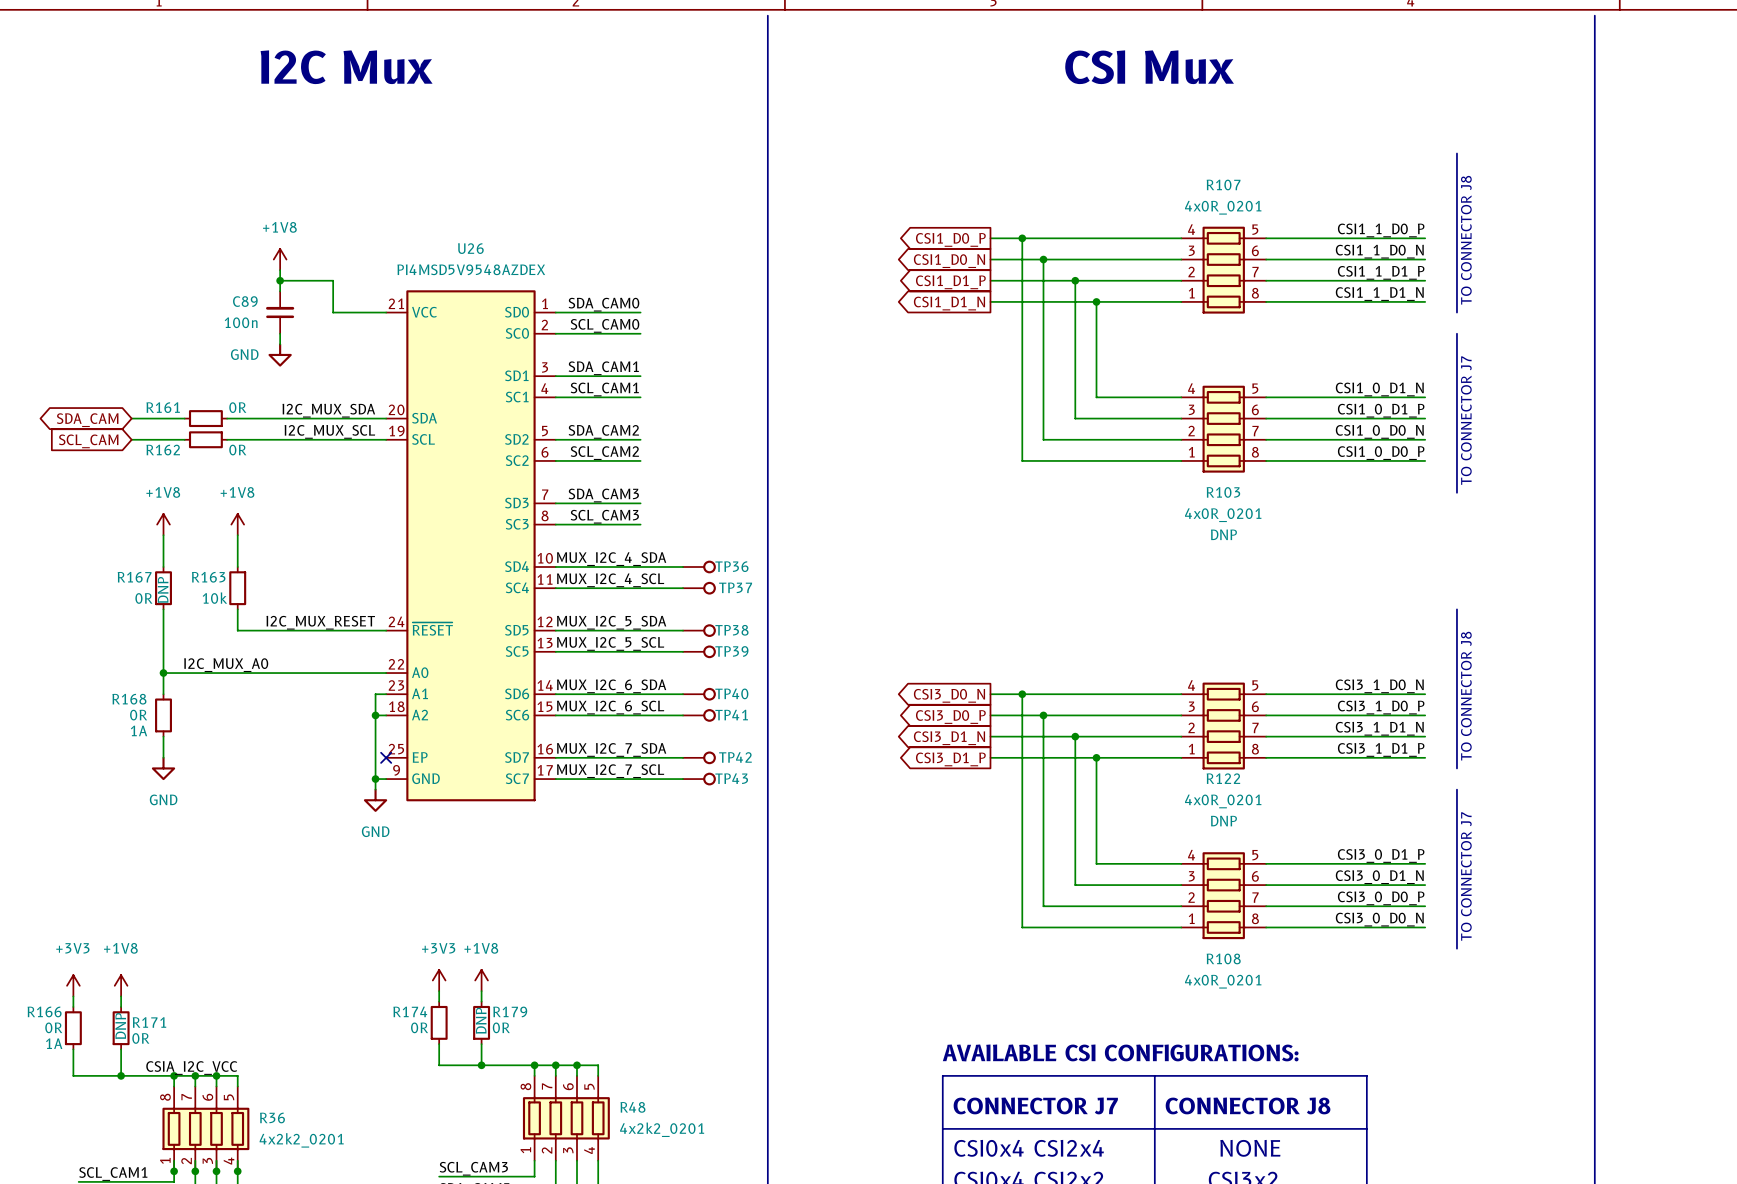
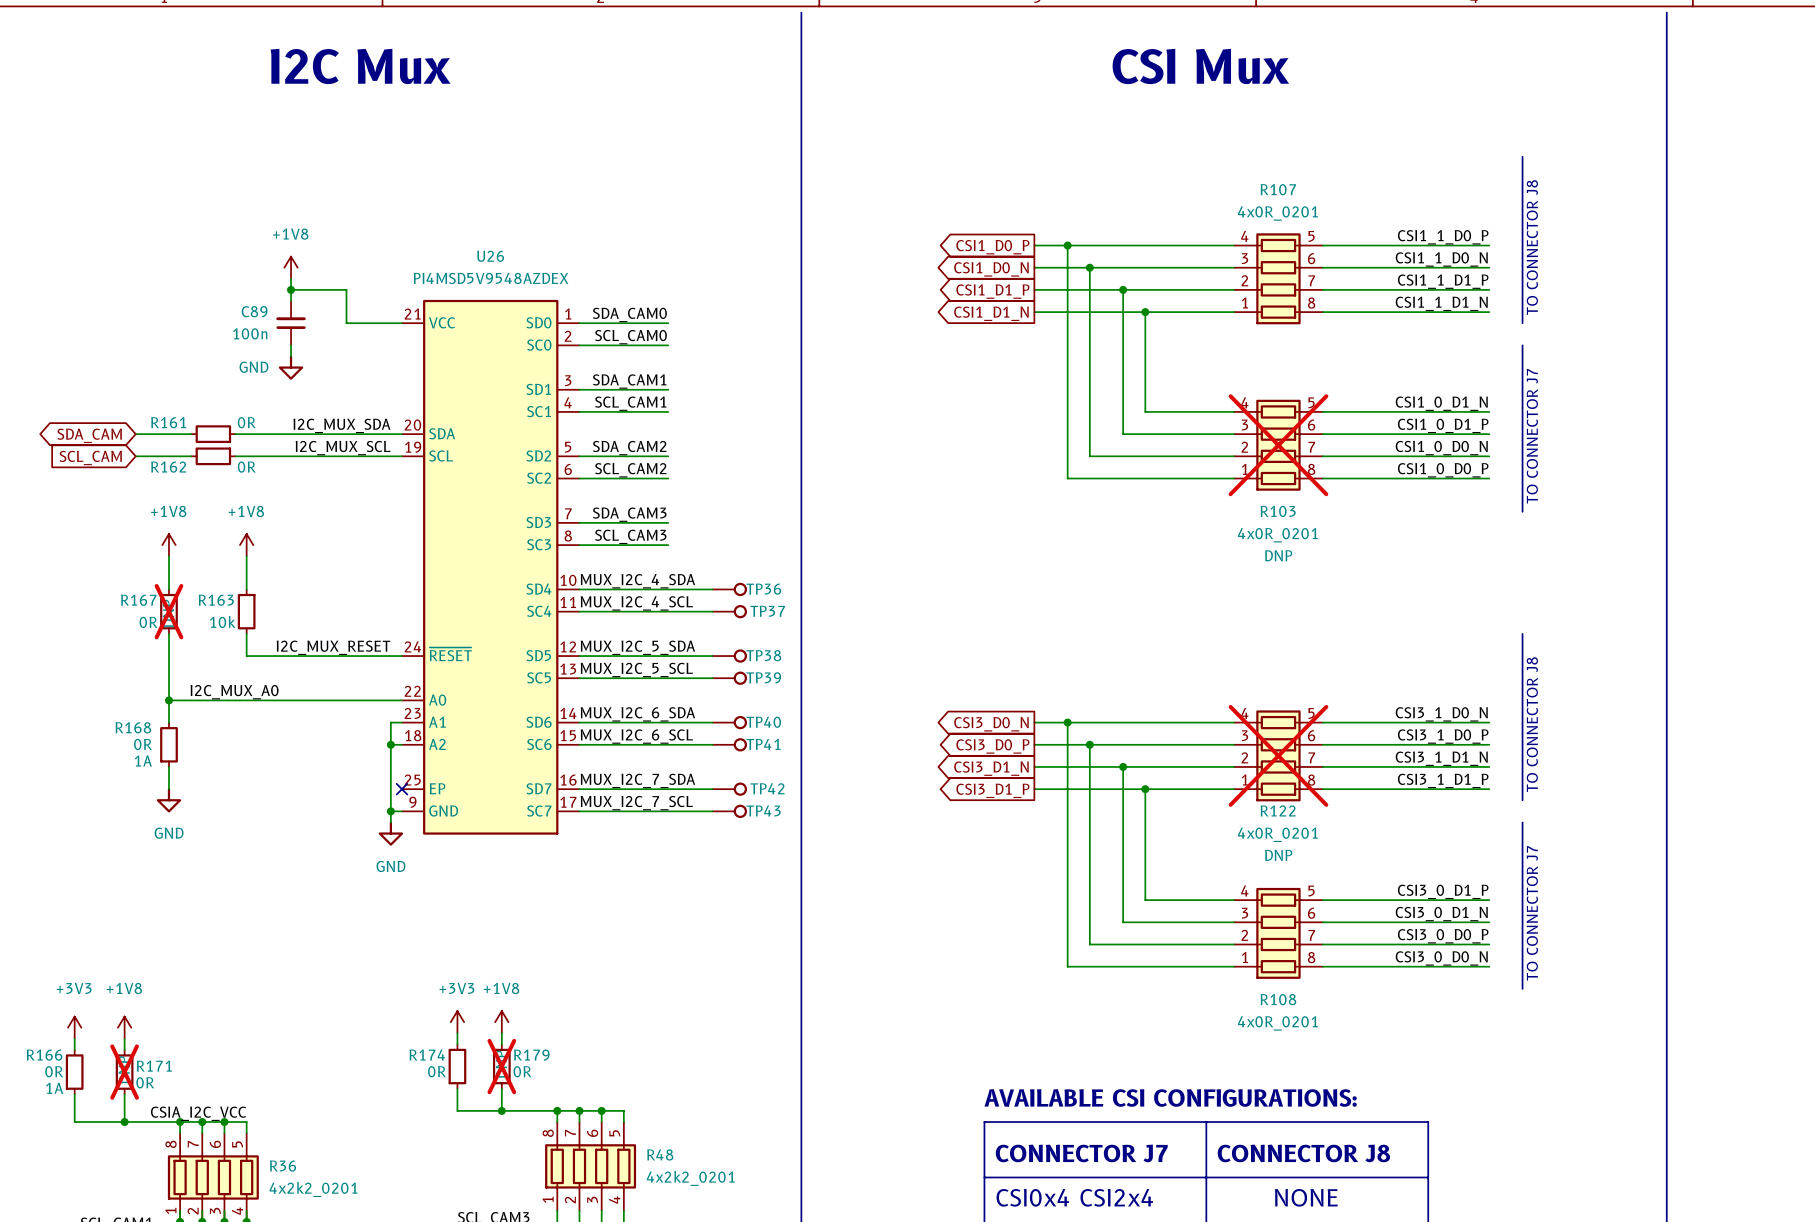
R103 do-not-place cross: none -> (1278, 445)
R167 do-not-place cross: none -> (168, 611)
R122 do-not-place cross: none -> (1278, 755)
R179 do-not-place cross: none -> (501, 1066)
R171 do-not-place cross: none -> (124, 1072)

